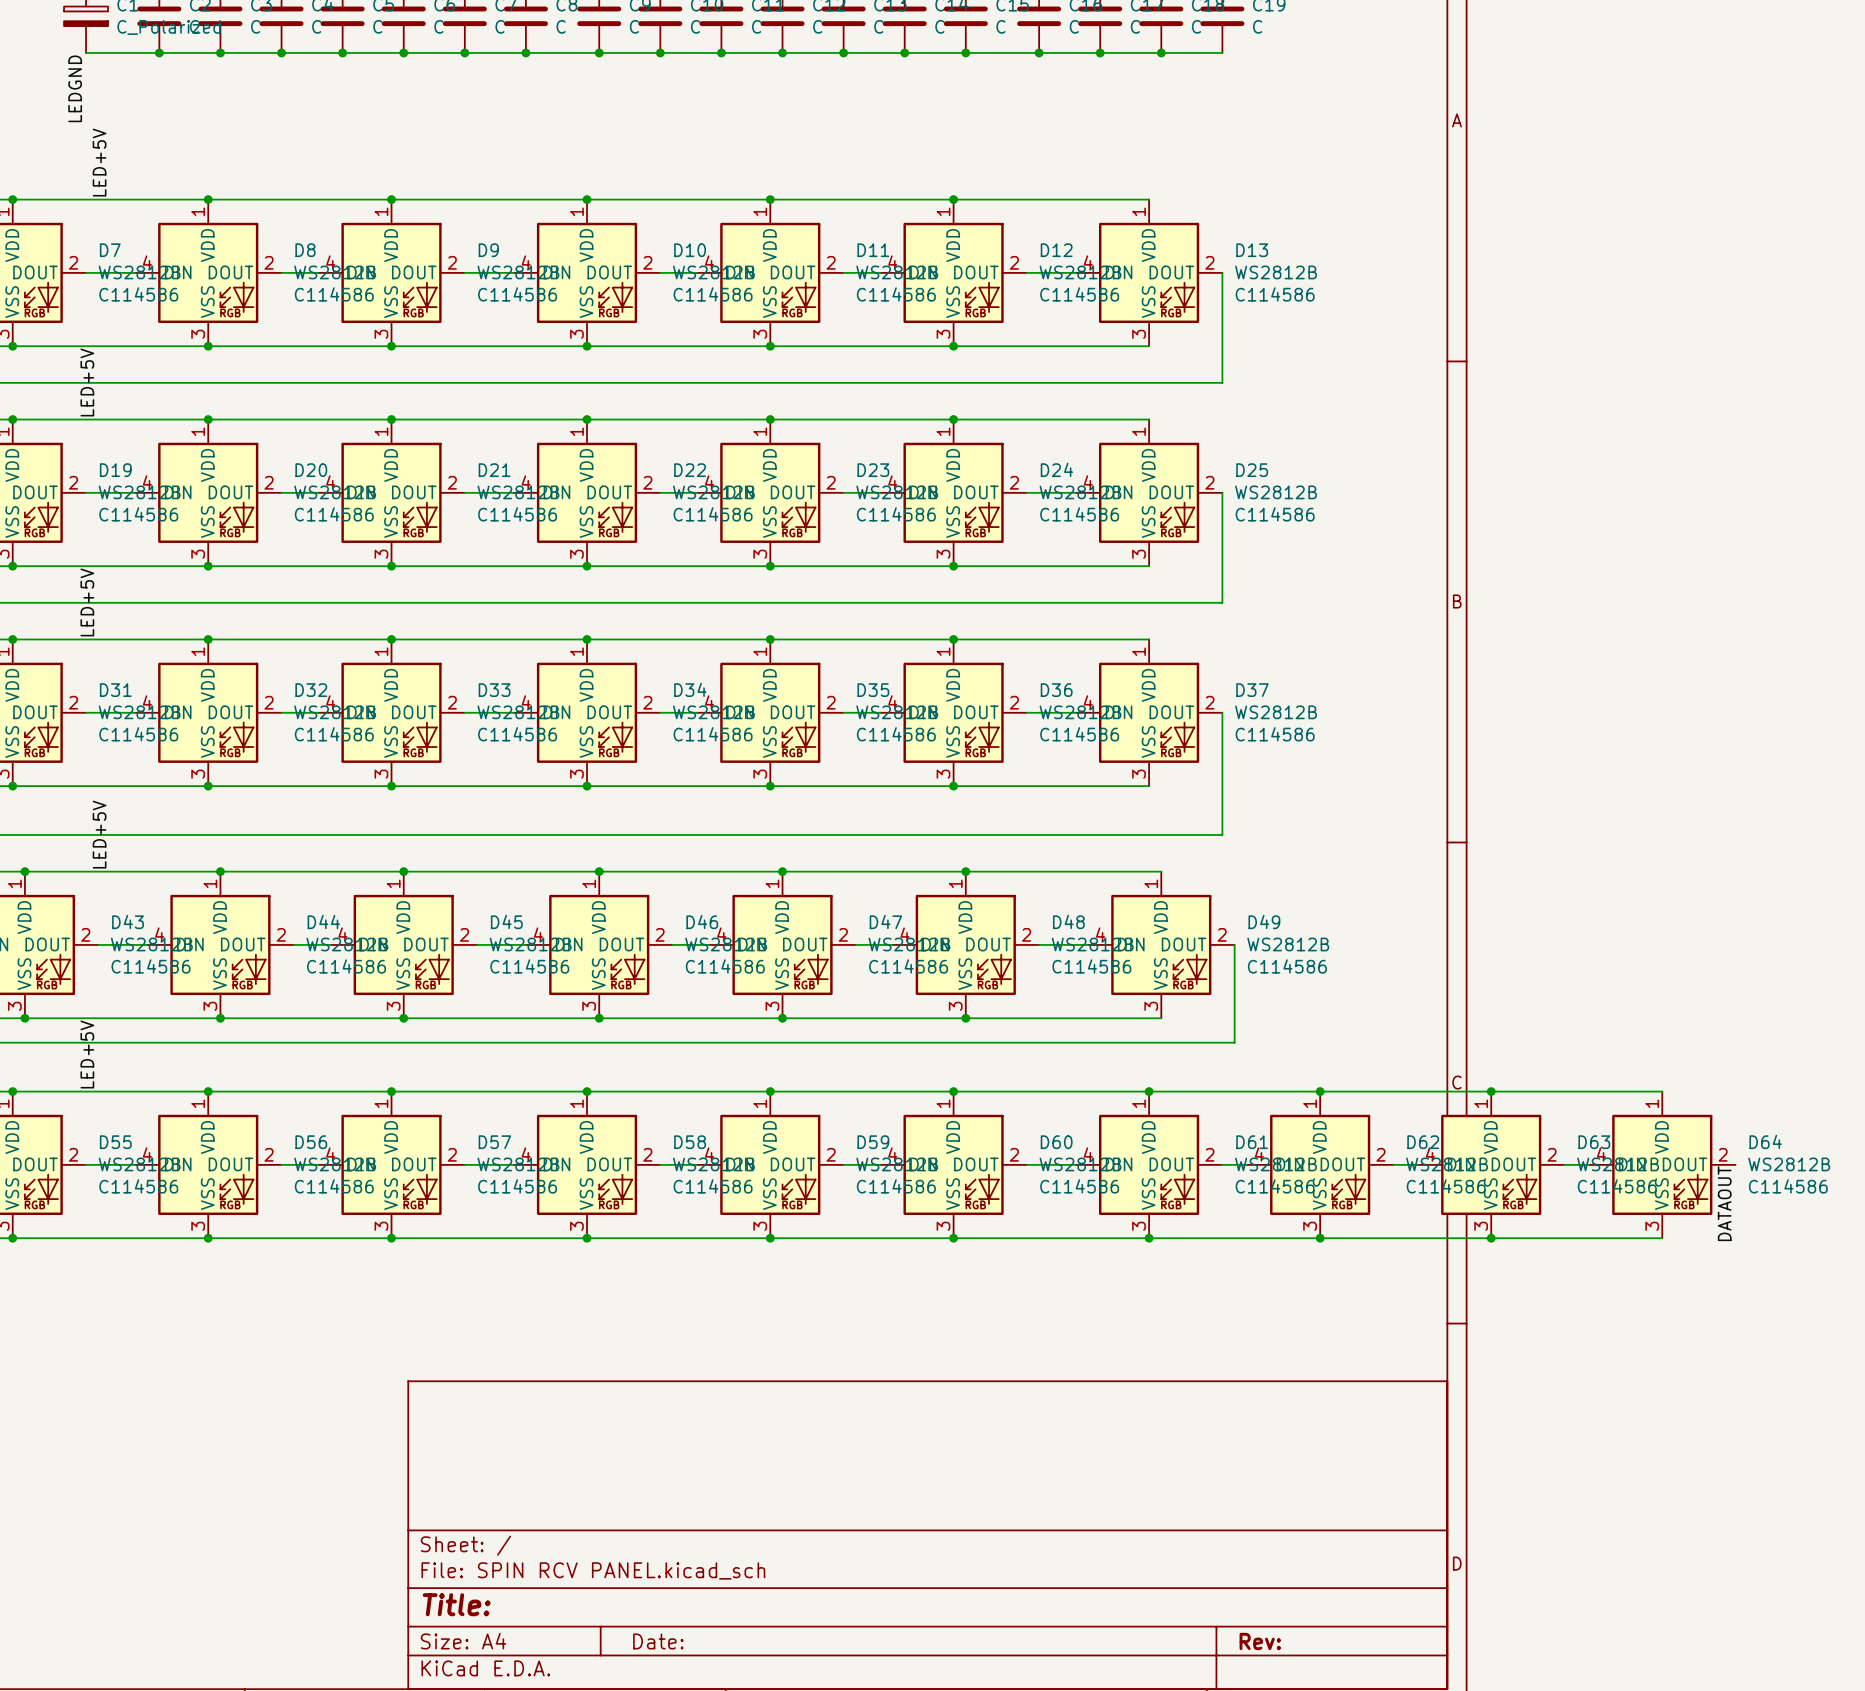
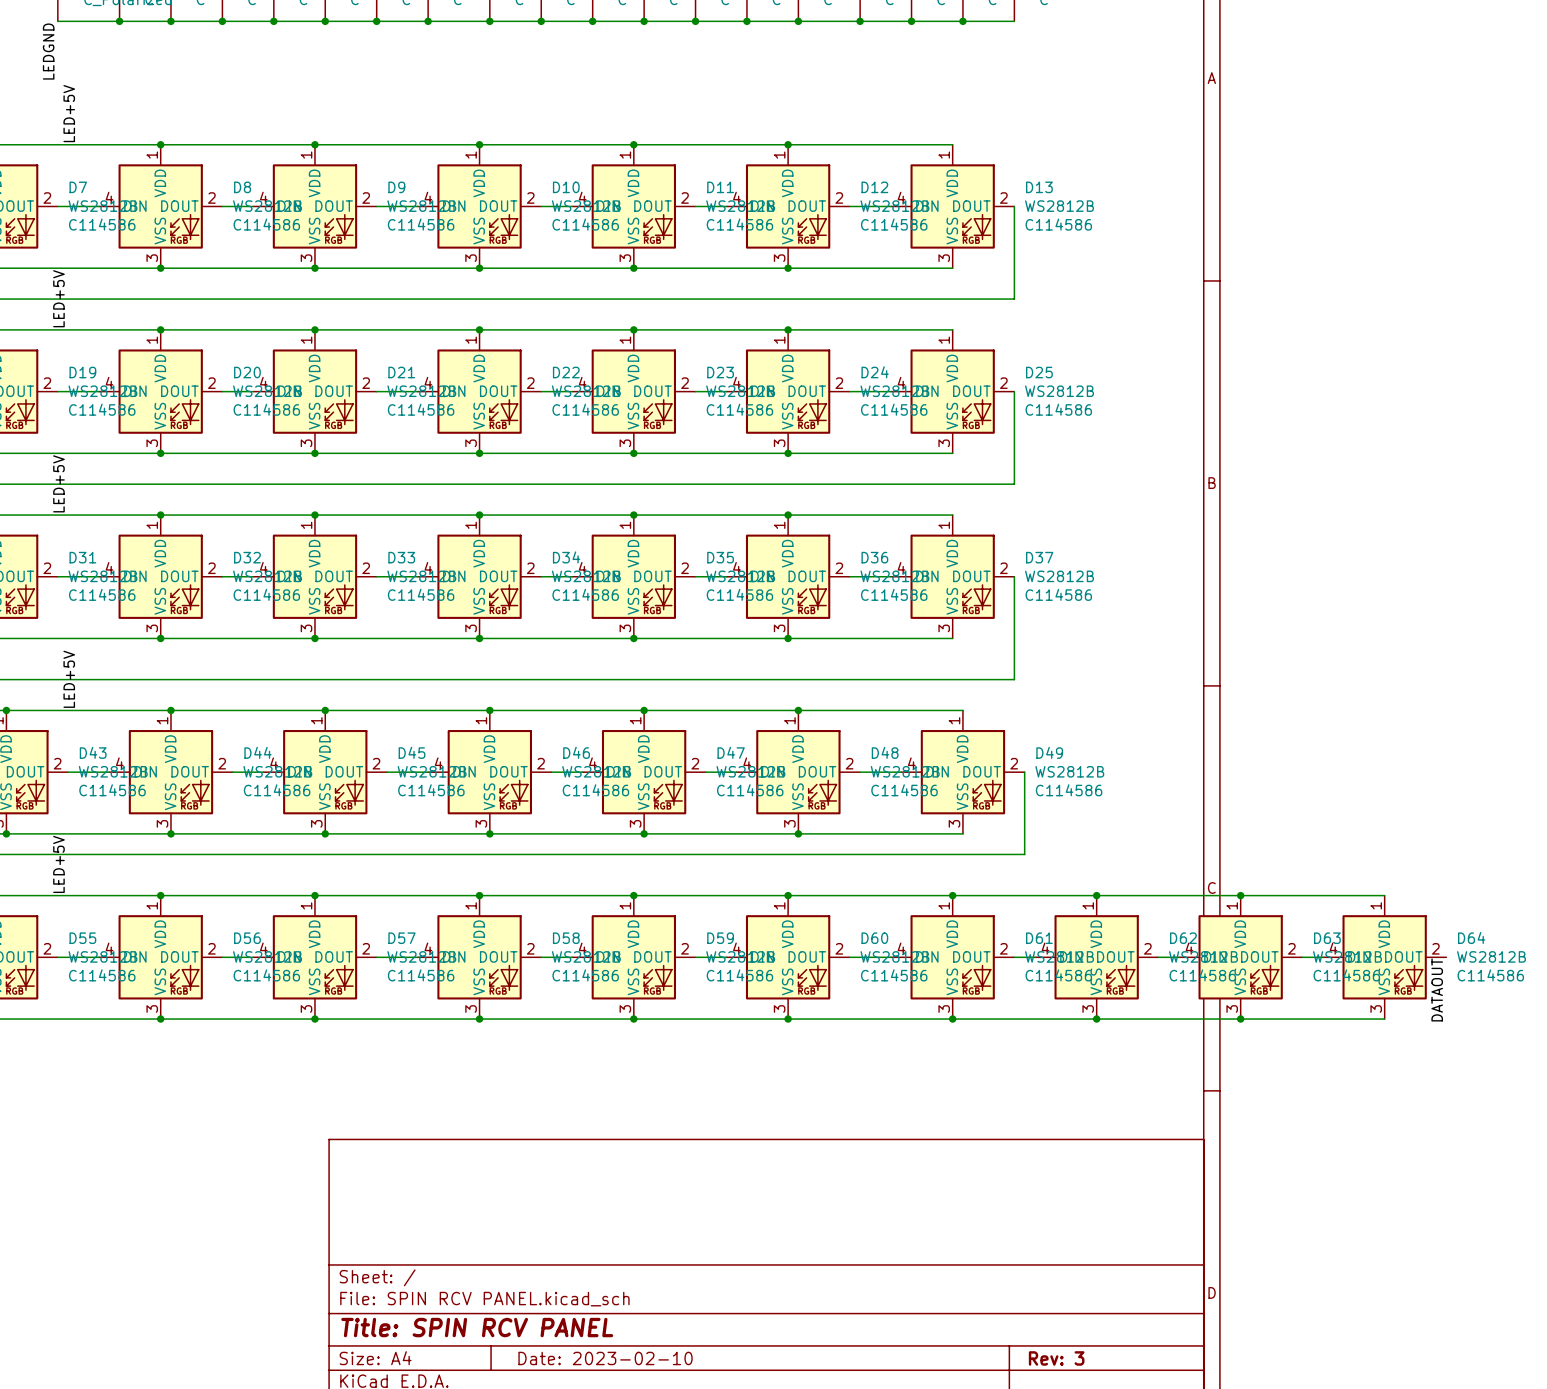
title block: Title: (456, 1604) -> Title: SPIN RCV PANEL (477, 1327)
title block: Date: (658, 1641) -> Date: 2023-02-10 (605, 1358)
title block: Rev: (1260, 1641) -> Rev: 3 (1056, 1358)

